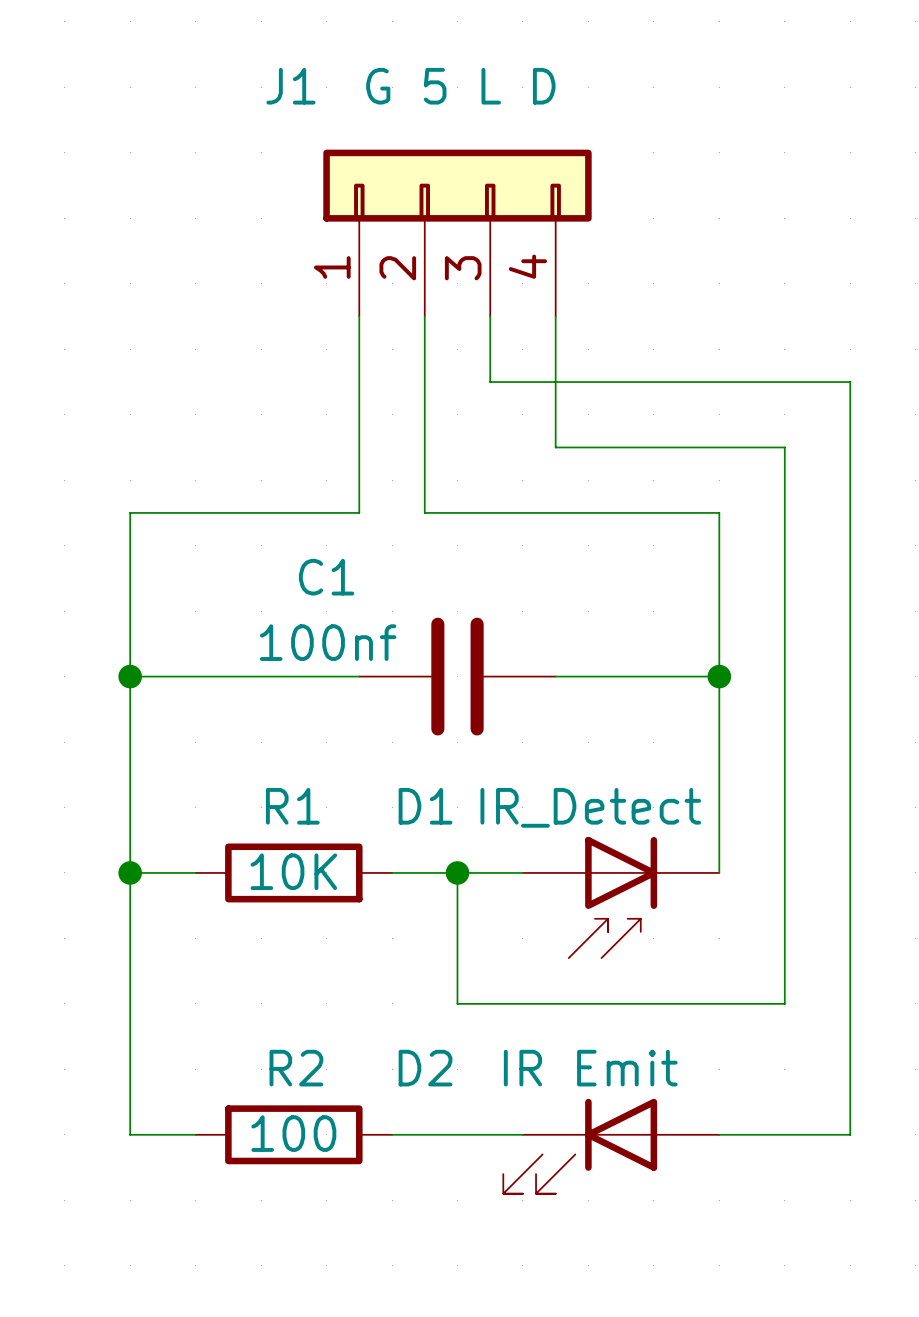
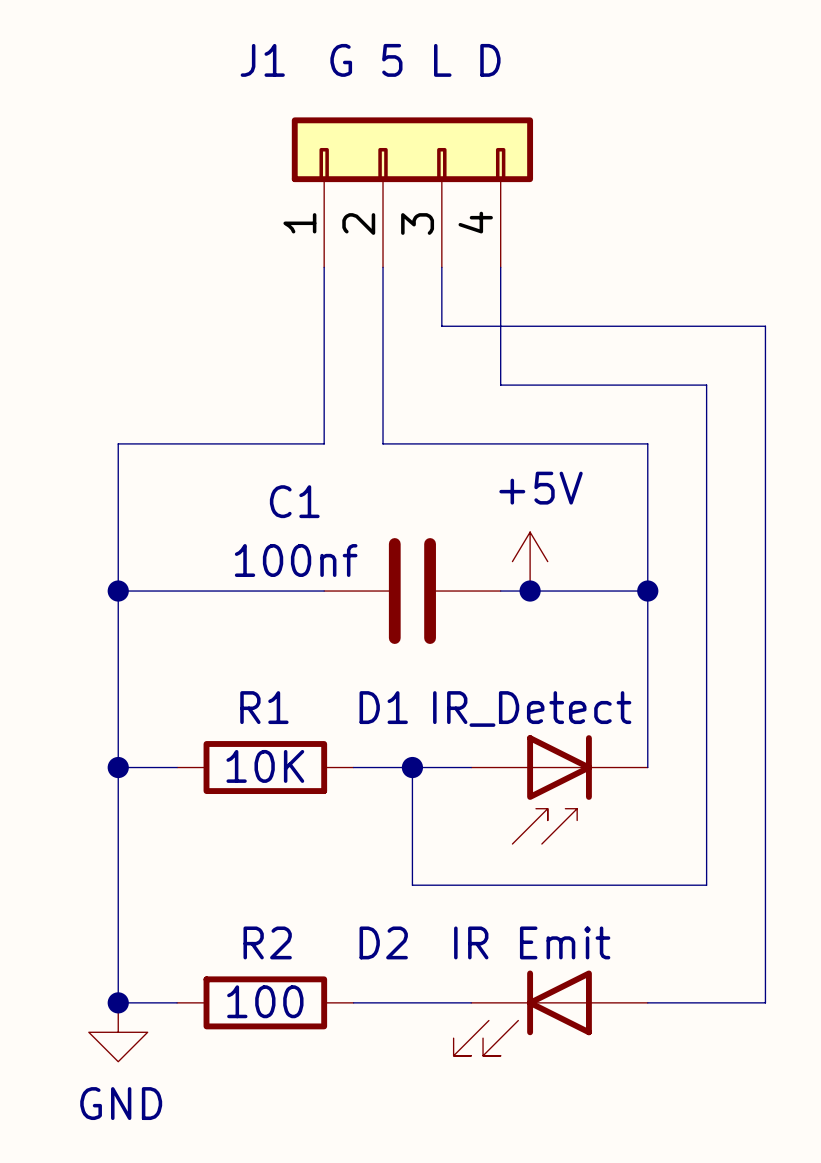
power symbol: none -> +5V (530, 561)
junction: none -> (530, 591)
junction: none -> (118, 1002)
power symbol: none -> GND (118, 1032)

